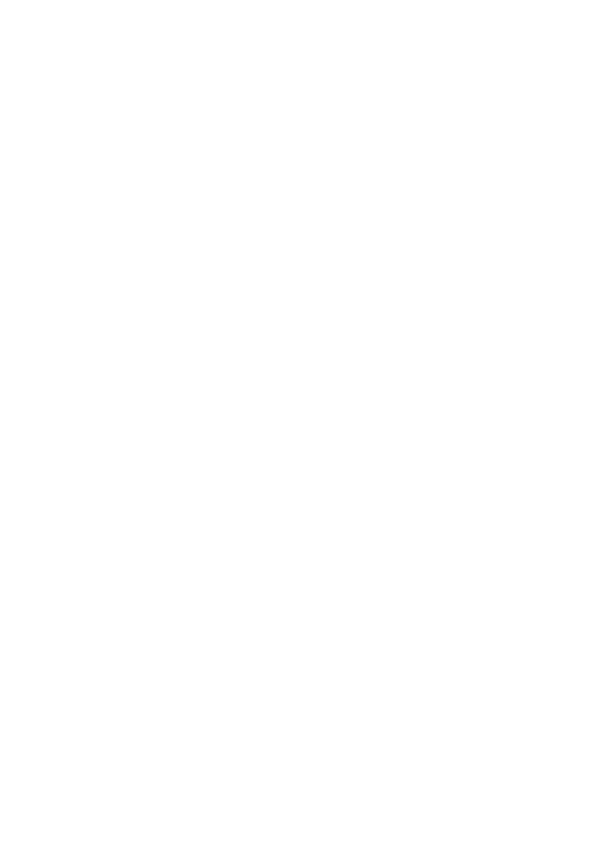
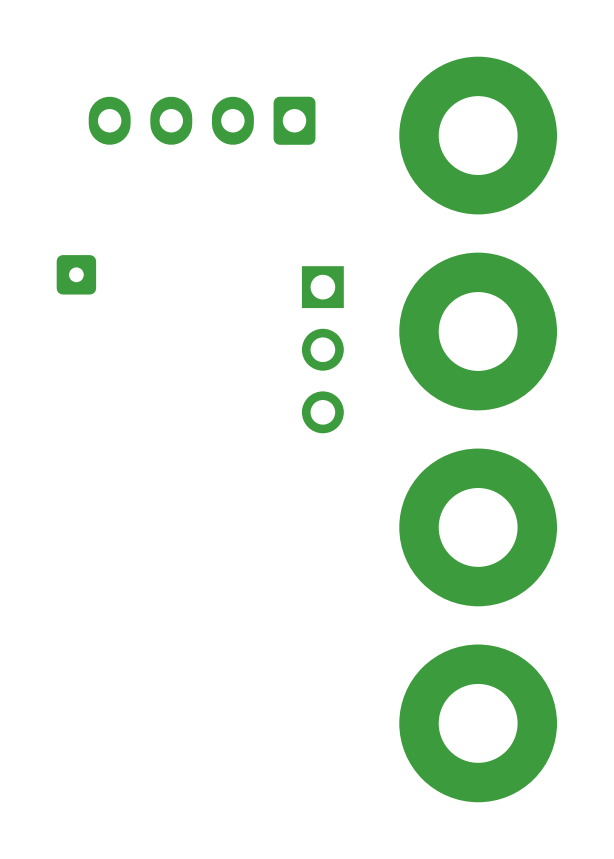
part: none -> (202, 120)
part: none -> (478, 135)
part: none -> (76, 274)
part: none -> (478, 331)
part: none -> (322, 349)
part: none -> (478, 527)
part: none -> (478, 723)

